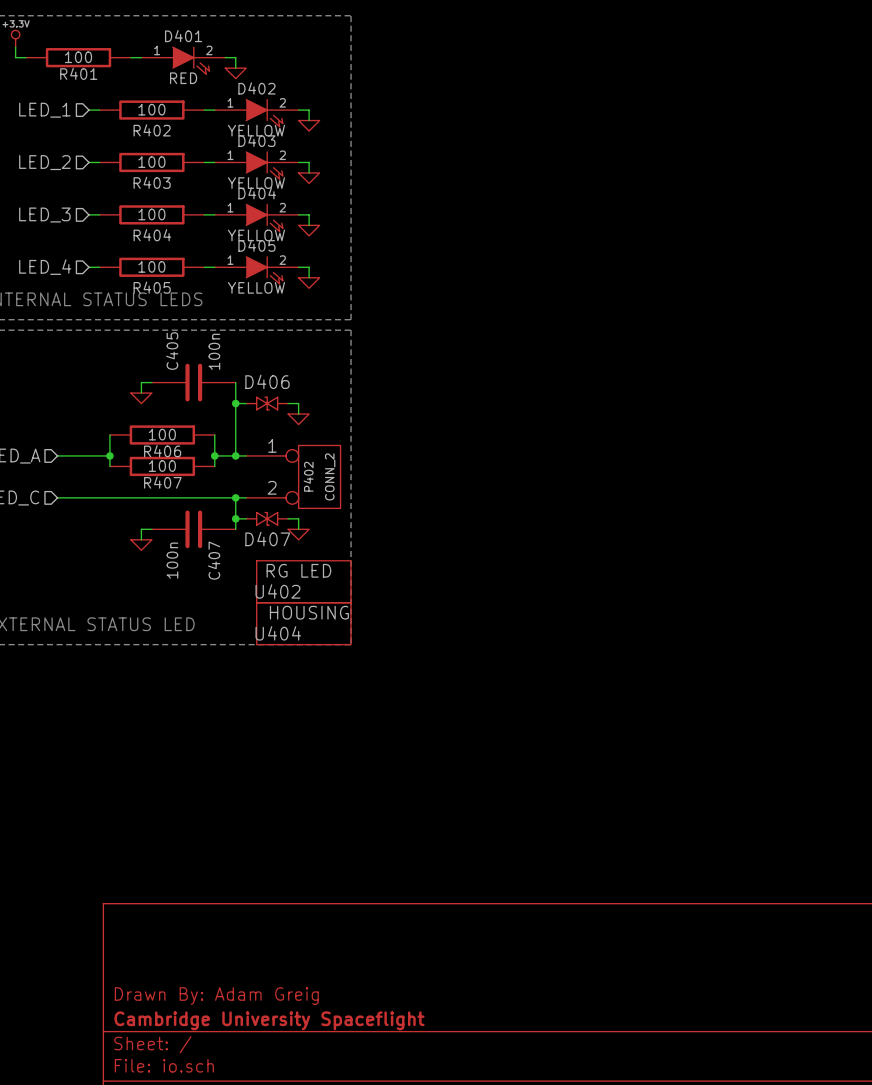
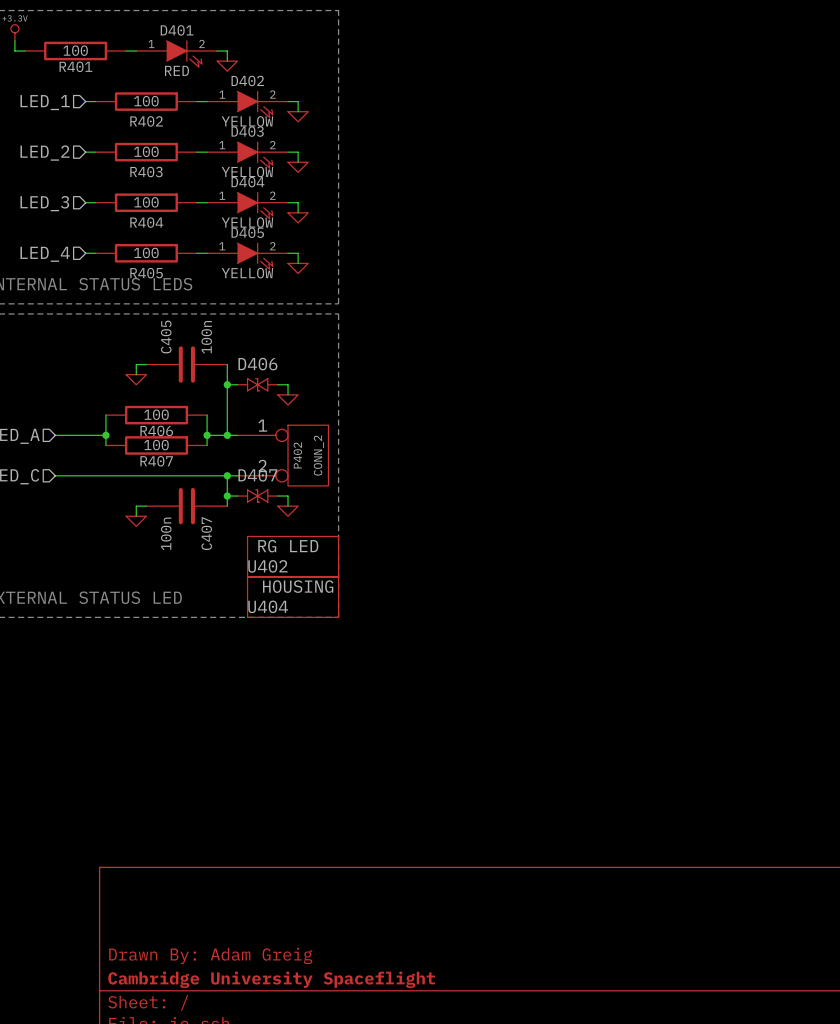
D407 name position: D407 (267, 539) -> D407 (257, 475)

